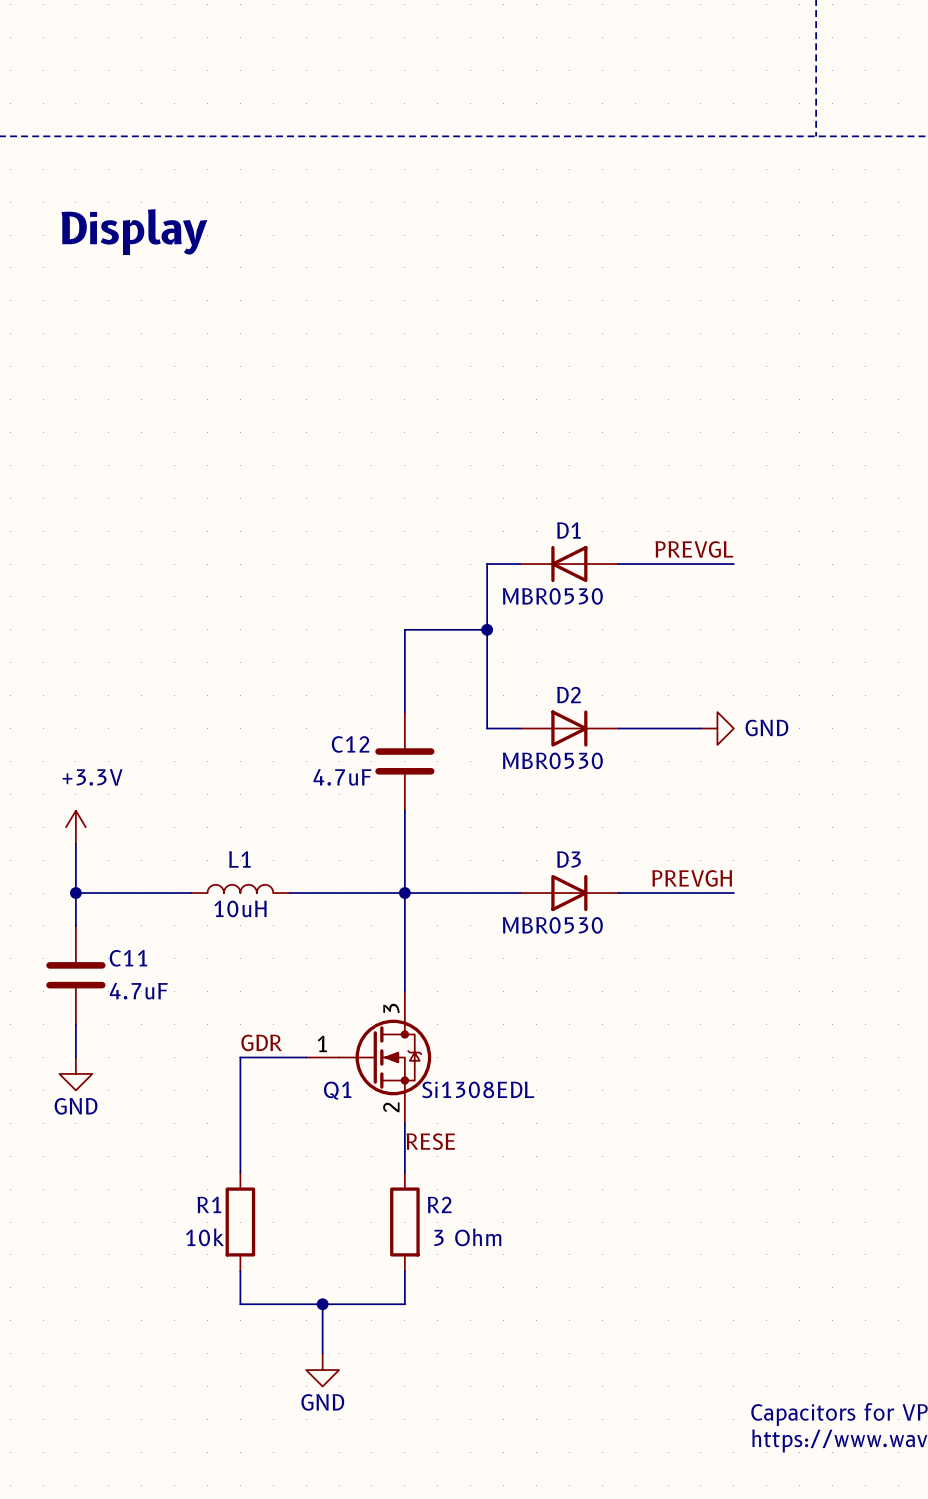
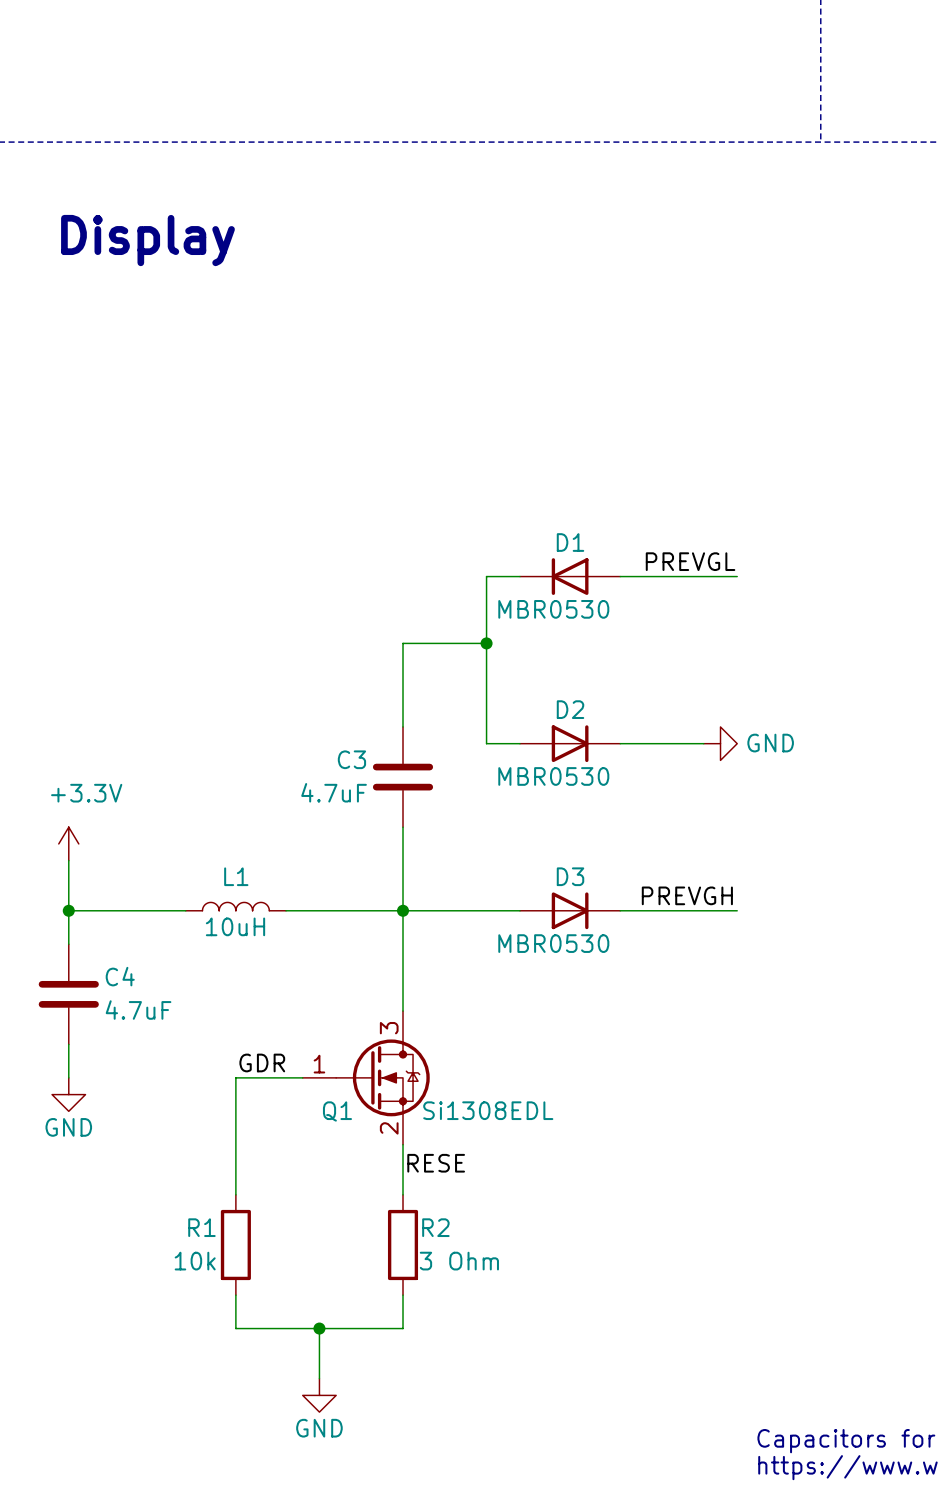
C12 name: C12 (350, 744) -> C3 (351, 759)
C11 name: C11 (128, 958) -> C4 (120, 976)

